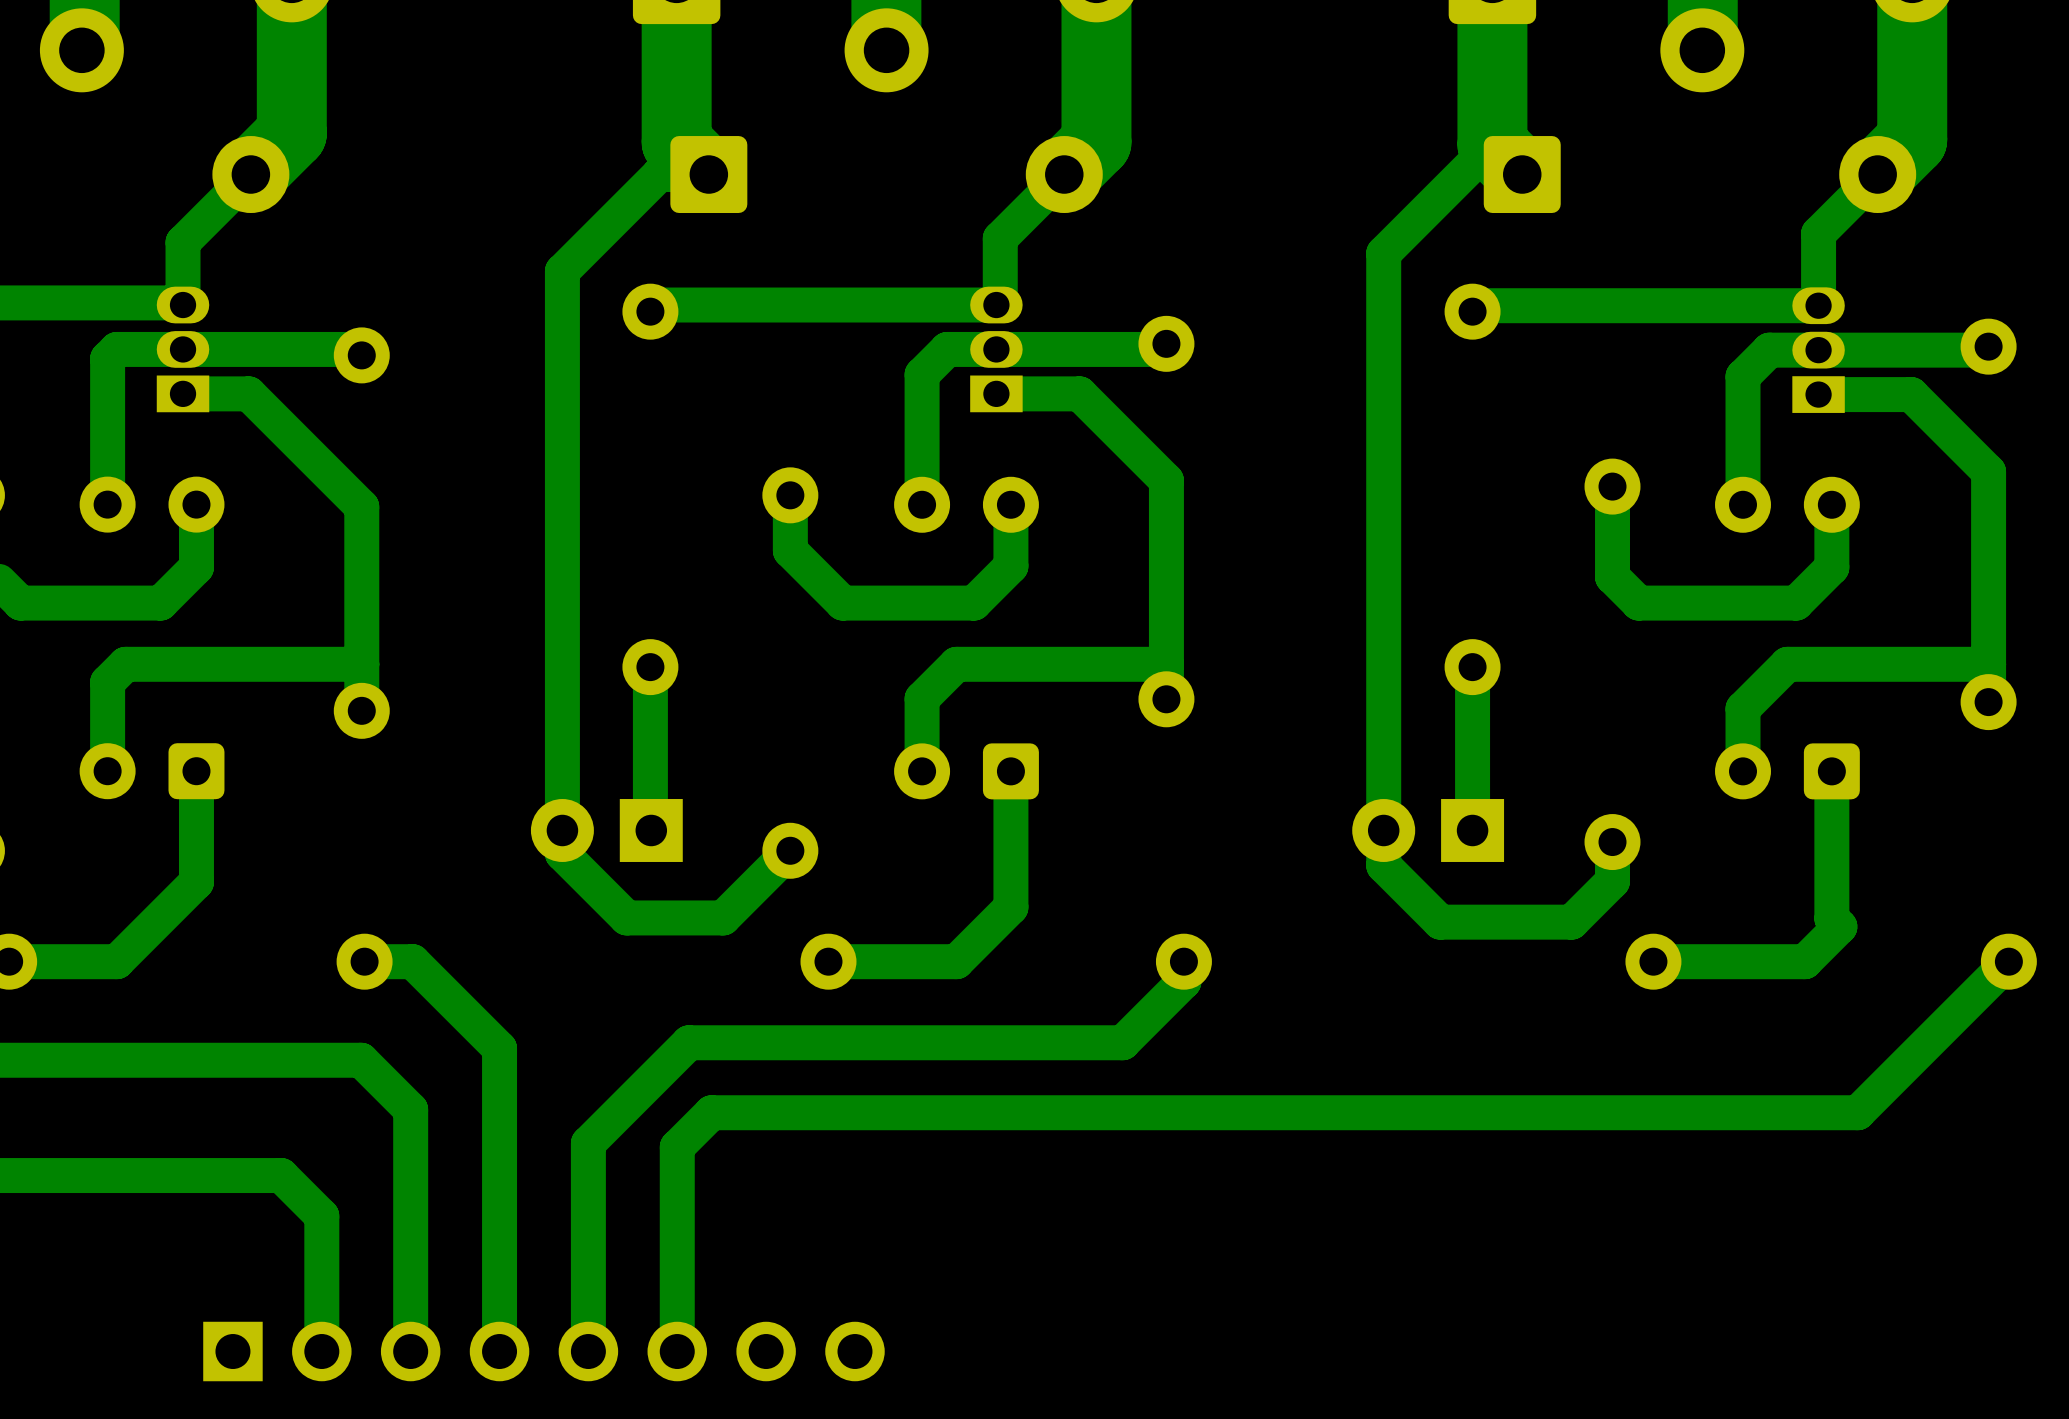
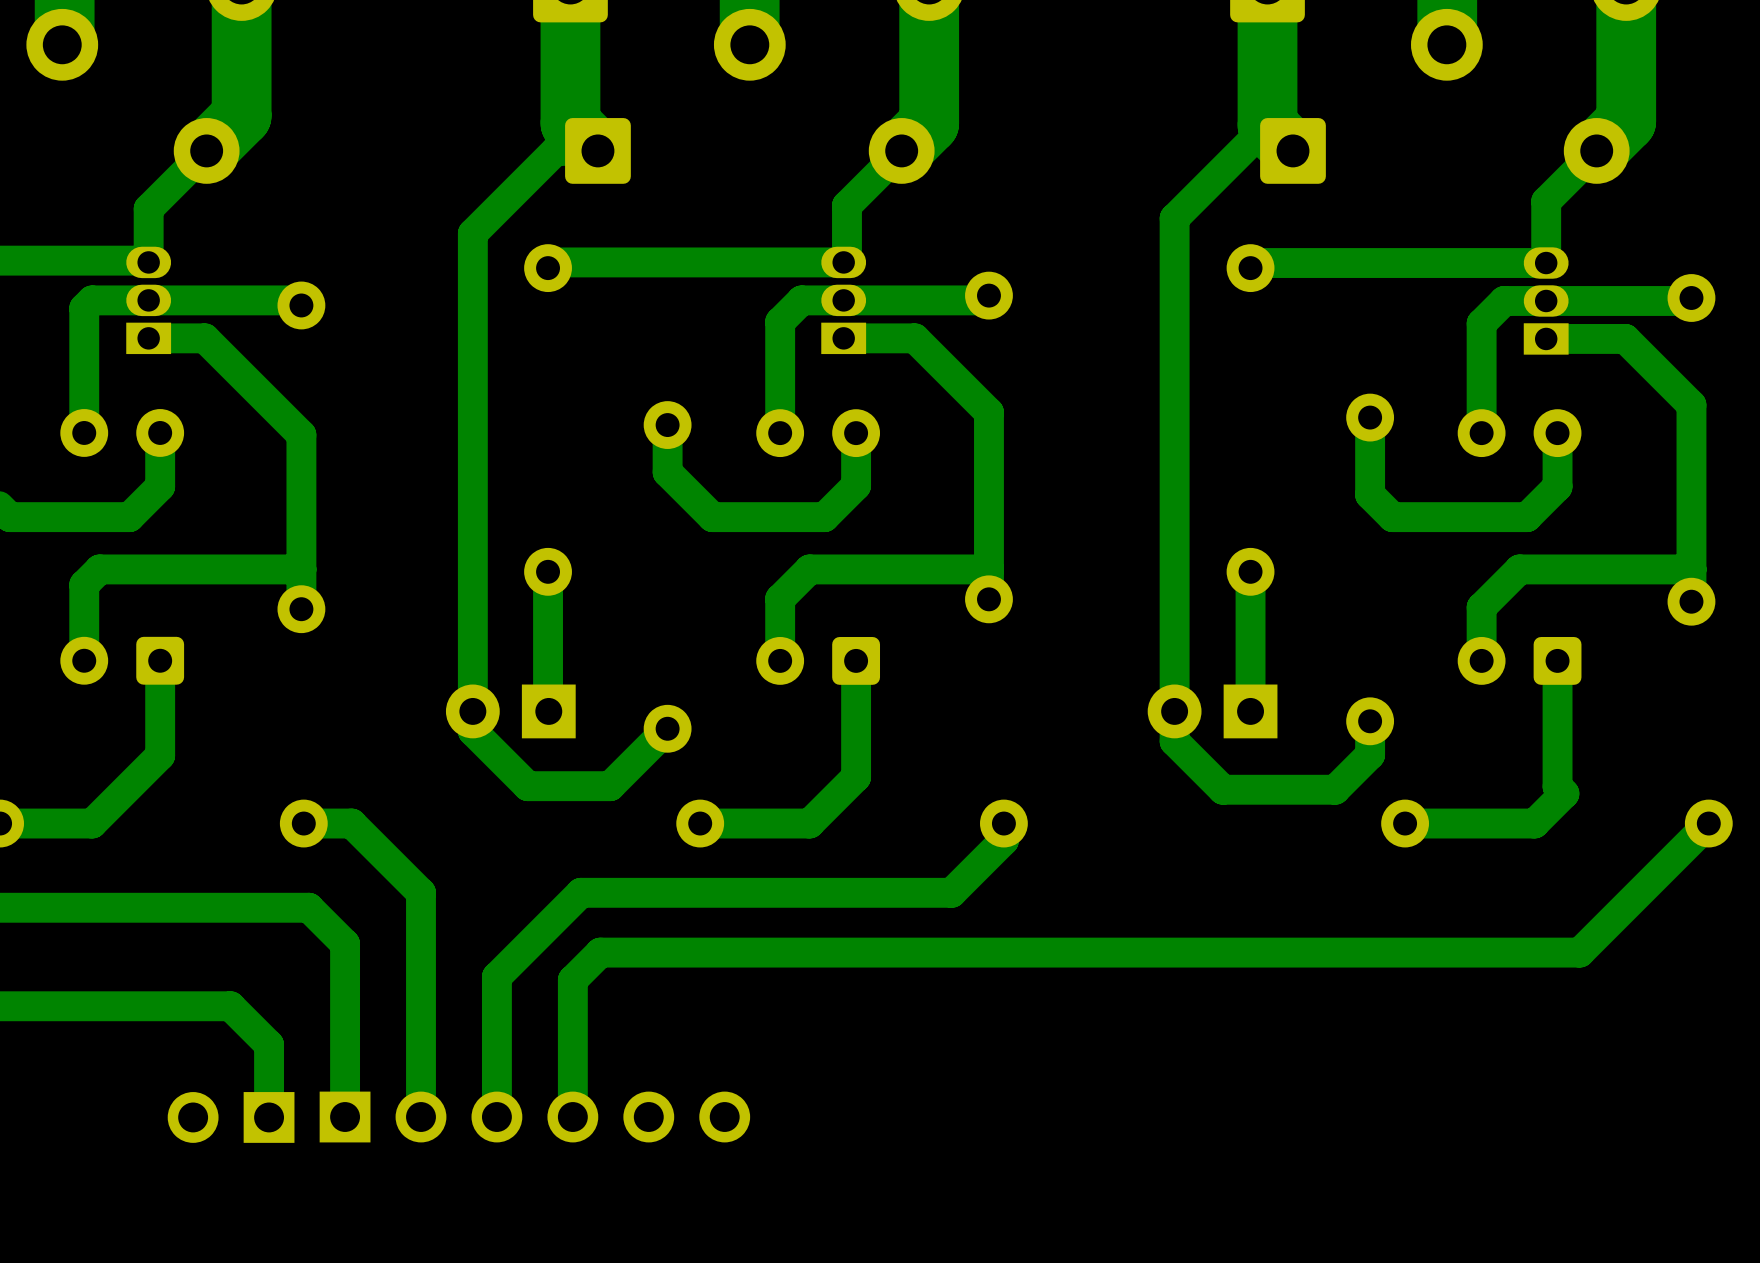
track: (412, 961) (499, 1048) (499, 1351) -> (344, 823) (351, 823) (420, 892) (420, 1117)
track: (361, 1060) (410, 1109) (410, 1351) -> (300, 907) (308, 907) (345, 943) (345, 1117)
track: (590, 1141) (588, 1143) (588, 1351) -> (496, 976) (496, 1117)
track: (679, 1144) (677, 1147) (677, 1351) -> (572, 980) (572, 1117)
track: (278, 1175) (281, 1175) (321, 1216) (321, 1351) -> (230, 1006) (269, 1044) (269, 1117)
part: none -> (231, 1117)
part: none -> (534, 1117)
part: (543, 1351) -> none

